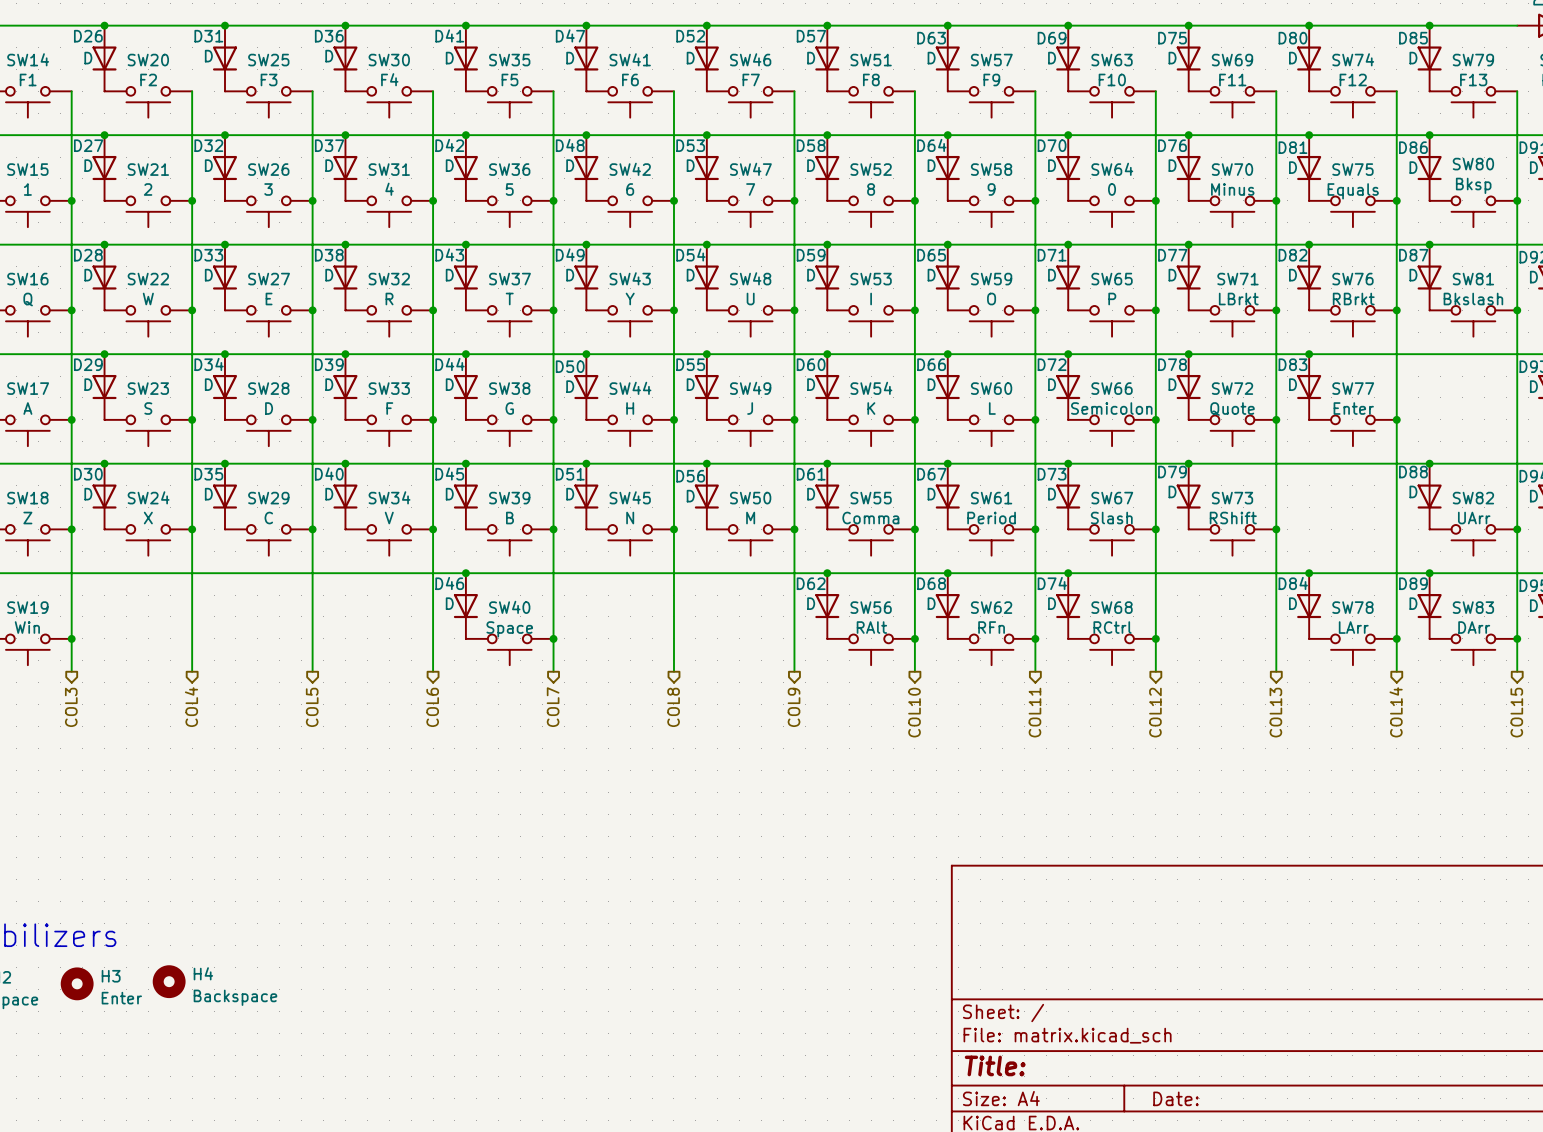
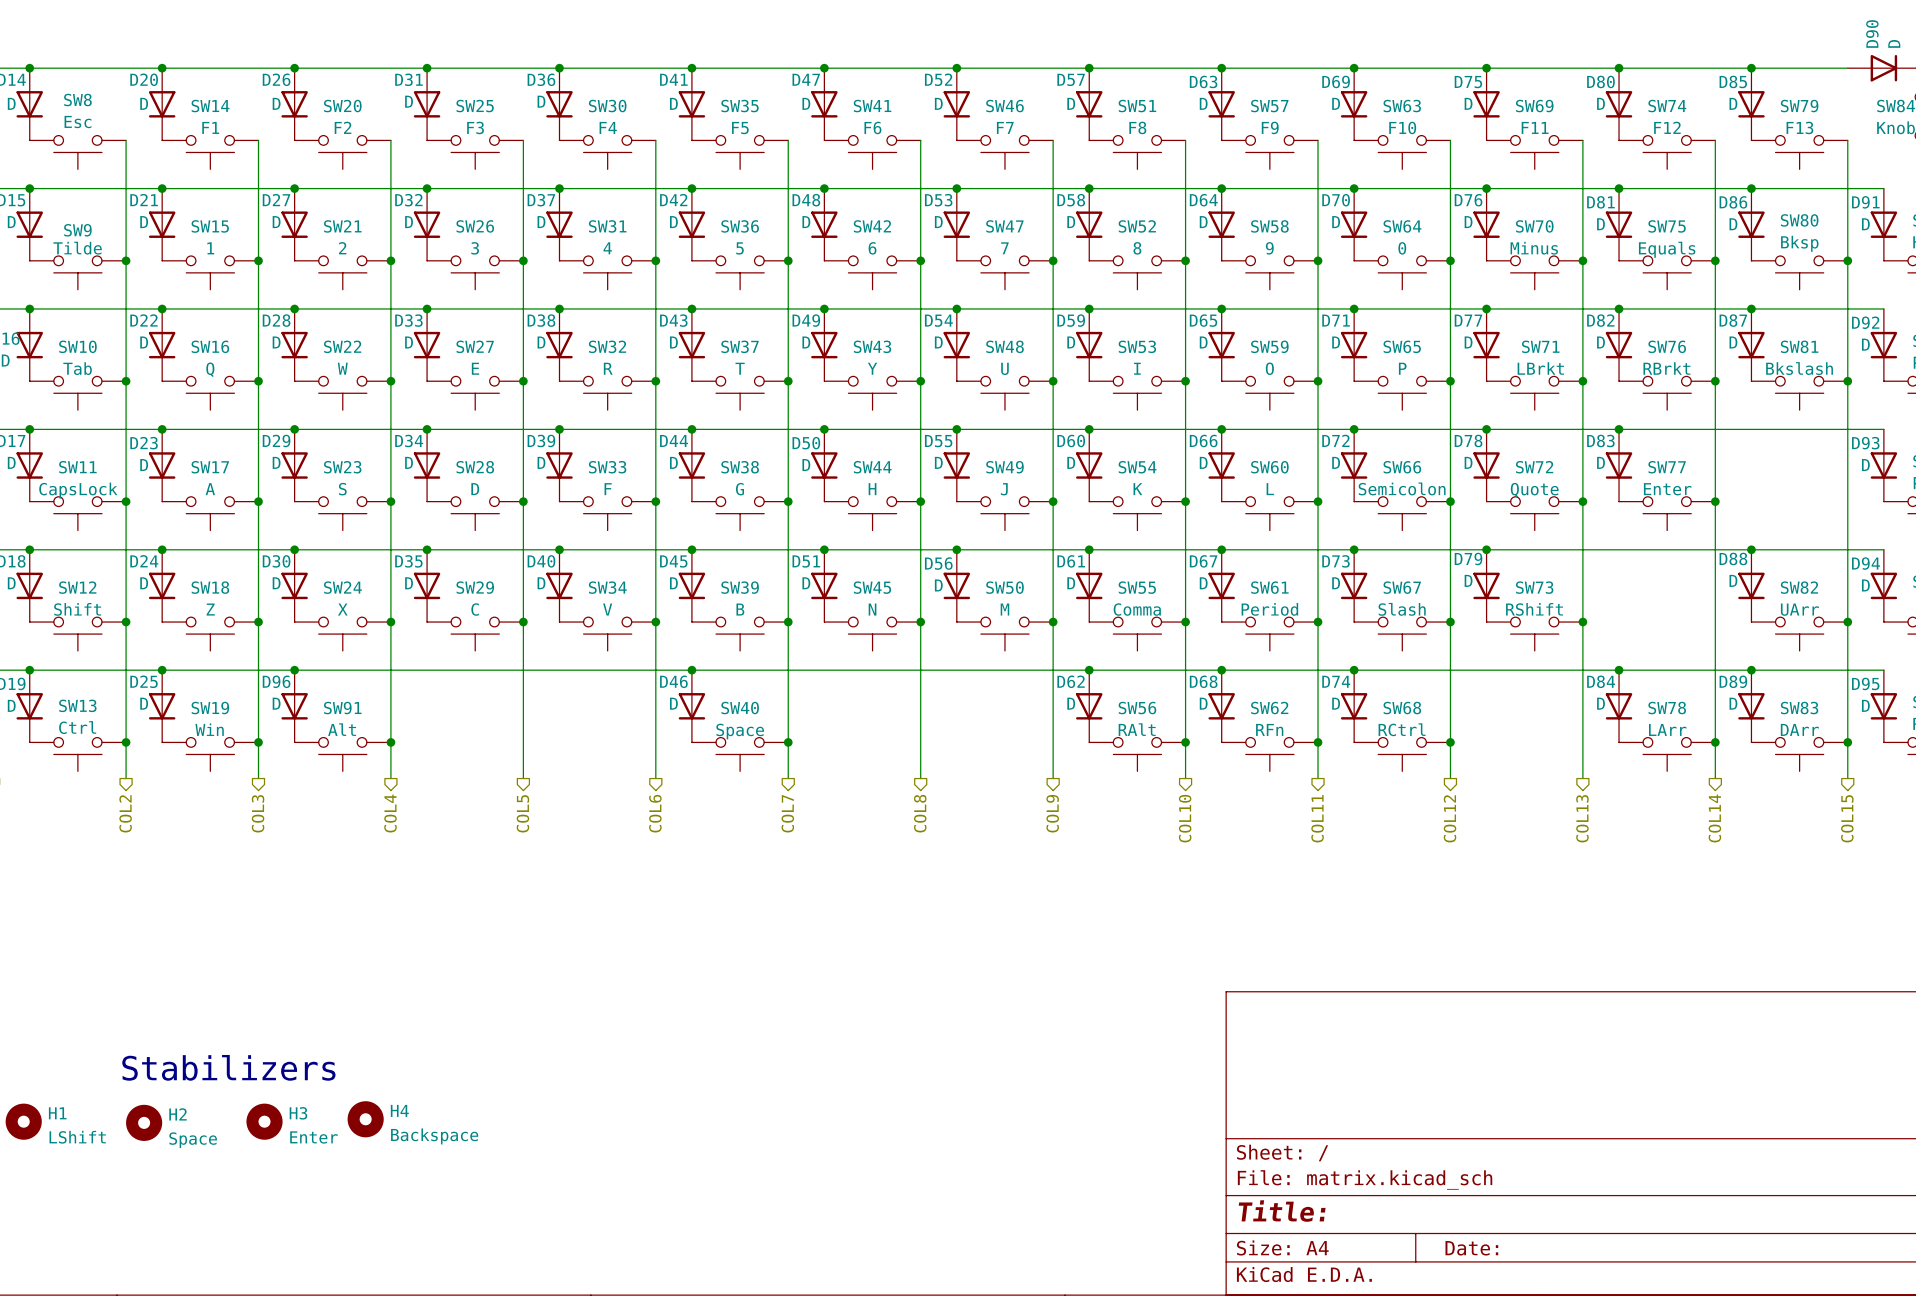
junction: none -> (294, 670)
D96: none -> D (294, 706)
junction: none -> (390, 742)
SW91: none -> Alt (342, 754)

